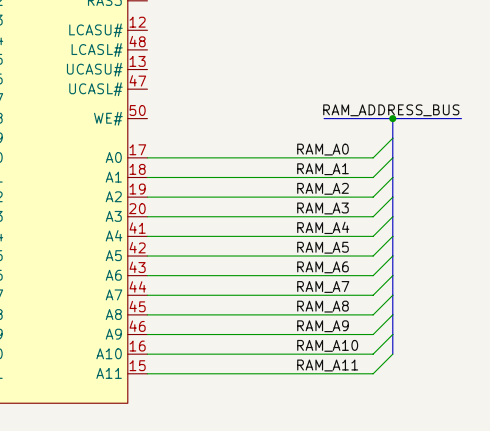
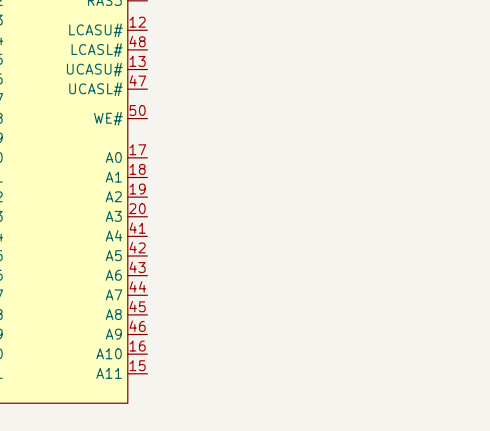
label: RAM_ADDRESS_BUS (391, 110) -> none
bus: (324, 118) (461, 118) -> none
bus: (392, 118) (392, 354) -> none
junction: (392, 118) -> none
wire: (392, 138) (373, 157) (147, 157) -> none
label: RAM_A0 (322, 149) -> none
wire: (392, 157) (373, 177) (147, 177) -> none
label: RAM_A1 (322, 169) -> none
wire: (392, 177) (373, 197) (147, 197) -> none
label: RAM_A2 (322, 188) -> none
wire: (392, 197) (373, 216) (147, 216) -> none
label: RAM_A3 (322, 208) -> none
wire: (392, 216) (373, 236) (147, 236) -> none
label: RAM_A4 (323, 227) -> none
wire: (392, 236) (373, 256) (147, 256) -> none
label: RAM_A5 (322, 247) -> none
wire: (392, 256) (373, 275) (147, 275) -> none
label: RAM_A6 (322, 267) -> none
wire: (392, 275) (373, 295) (147, 295) -> none
label: RAM_A7 (323, 286) -> none
wire: (392, 295) (373, 314) (147, 314) -> none
label: RAM_A8 (322, 306) -> none
wire: (392, 314) (373, 334) (147, 334) -> none
label: RAM_A9 (322, 326) -> none
wire: (392, 334) (373, 354) (147, 354) -> none
label: RAM_A10 (327, 345) -> none
wire: (392, 354) (373, 373) (147, 373) -> none
label: RAM_A11 (327, 365) -> none

